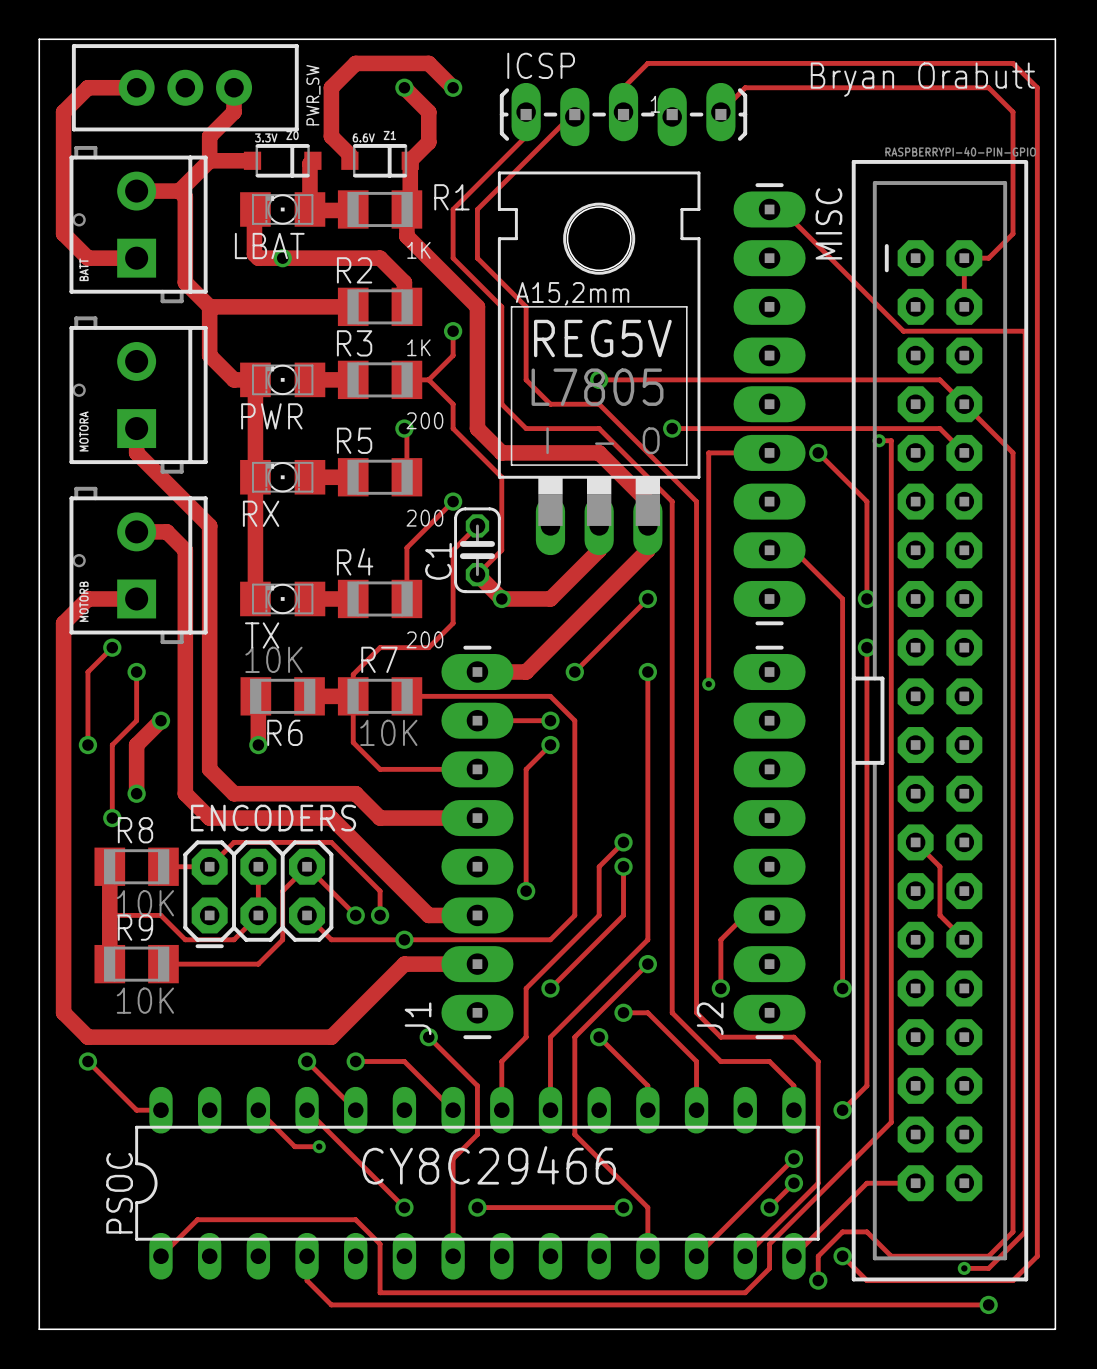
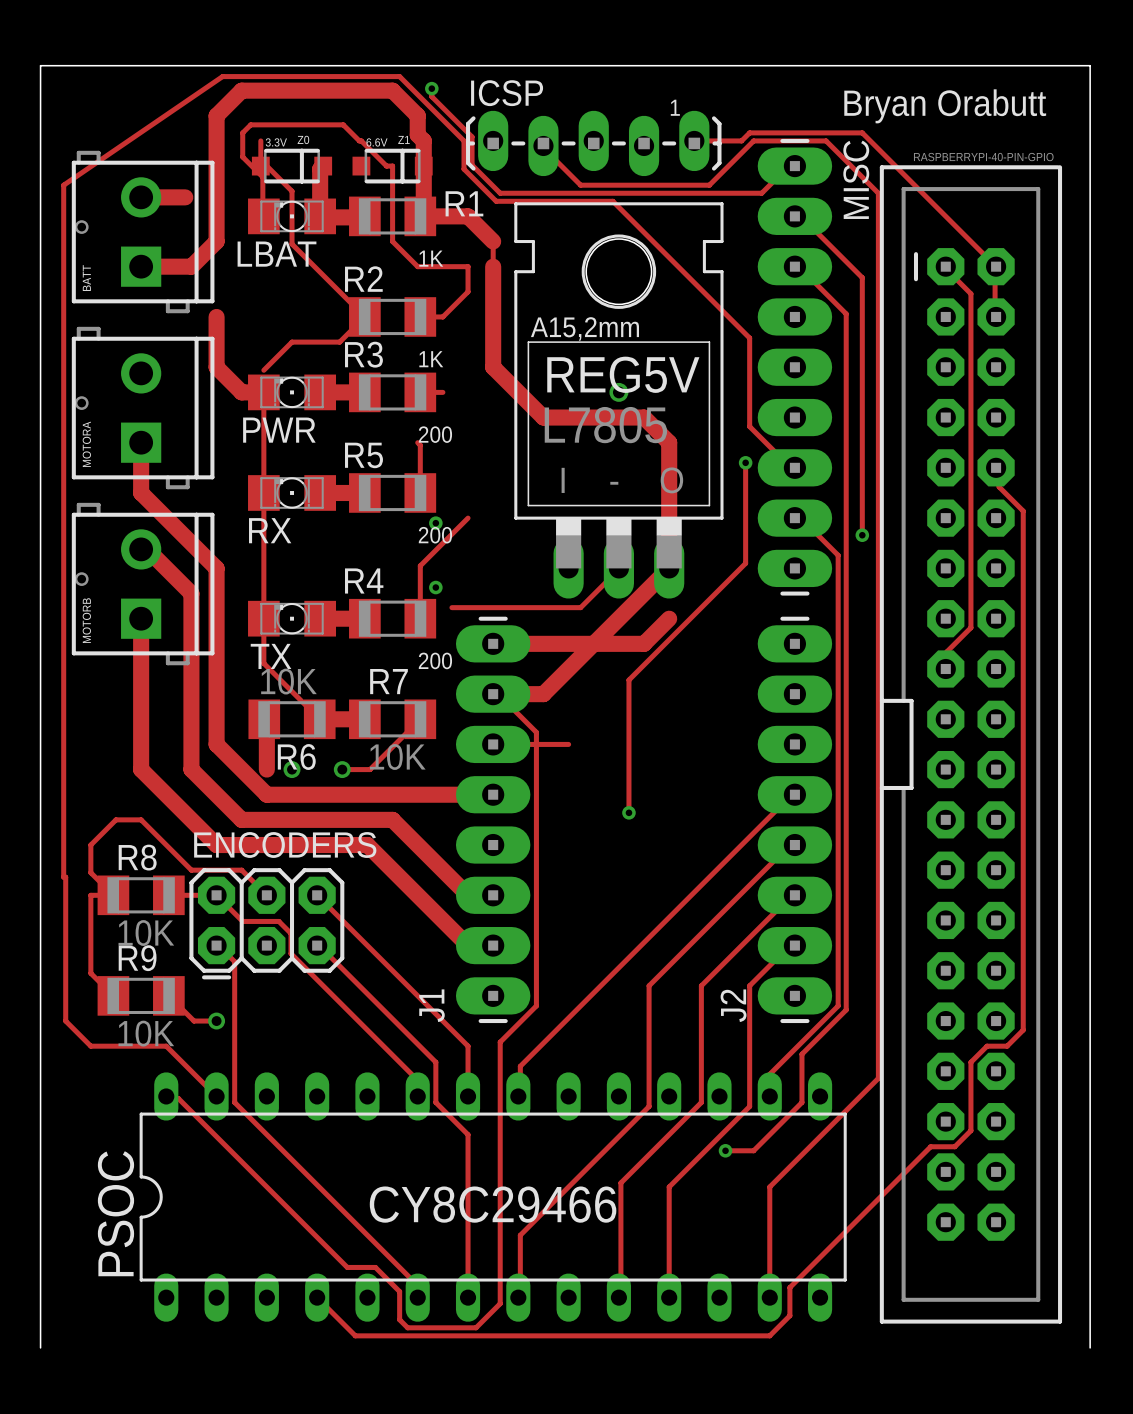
board edge: (39, 63) (39, 39) (1055, 39) (1055, 63) -> (40, 65) (1090, 65)
text position: Bryan Orabutt (922, 79) -> Bryan Orabutt (945, 106)
track: none -> (431, 88) (431, 96) (472, 136) (472, 165) (500, 193) (761, 193) (785, 169) (793, 169) (794, 166)
track: (136, 87) (87, 87) (63, 112) (63, 233) (87, 258) (136, 258) -> (216, 166) (216, 241) (191, 266) (141, 266)
PWR_SW: (185, 87) -> none
track: (234, 87) (234, 112) (209, 136) -> (423, 166) (423, 140) (417, 134) (417, 115) (392, 90) (241, 90) (216, 115) (216, 140)
track: (404, 87) (428, 112) (428, 142) (410, 160) -> none
via position: (404, 87) -> (431, 88)
track: (453, 87) (428, 63) (355, 63) (331, 87) (331, 136) (349, 154) (349, 160) -> none
via: (453, 87) -> none
track: (526, 112) (526, 136) (453, 209) (453, 258) (501, 306) (501, 404) (526, 428) (599, 428) (672, 501) (672, 1012) (720, 1061) (769, 1061) (793, 1085) (793, 1110) -> none
track: (623, 112) (623, 87) (647, 63) (1013, 63) (1037, 87) (1037, 1256) (1013, 1280) (866, 1280) (842, 1256) -> none
track: (720, 112) (745, 87) (988, 87) (1013, 112) (1013, 233) (988, 258) (964, 258) (964, 306) -> (694, 140) (741, 140) (749, 132) (862, 132) (996, 266) (996, 316)
ICSP position: (623, 114) -> (593, 143)
track: (574, 116) (569, 116) (477, 209) (477, 233) -> none
track: none -> (260, 140) (260, 160) (292, 191) (292, 244) (364, 316) (339, 342) (292, 342) (263, 370)
track: (252, 160) (209, 160) (179, 191) (185, 197) (185, 282) (209, 306) (353, 306) -> none
track: (254, 205) (254, 254) (258, 258) (380, 258) (404, 282) (404, 304) (406, 306) -> (262, 212) (262, 177) (242, 157) (242, 132) (250, 124) (343, 124) (386, 166) (392, 166) (392, 241) (417, 266) (468, 266) (468, 291) (442, 316) (420, 316)
track: (406, 209) (406, 236) (477, 306) -> (420, 216) (468, 216) (493, 241)
track: (769, 209) (781, 209) (903, 331) (1025, 331) (1025, 1231) (988, 1268) (964, 1268) -> (794, 216) (797, 213) (862, 277) (862, 535)
via: (282, 258) -> none
track: (477, 258) (526, 306) (526, 379) (550, 404) -> (493, 367) (543, 417) (568, 417)
track: none -> (493, 266) (493, 316)
track: none -> (794, 266) (797, 265) (846, 313) (846, 1009) (801, 1054) (801, 1102) (753, 1150) (725, 1150)
track: none -> (945, 266) (970, 293) (970, 627) (946, 651) (945, 669)
track: (453, 331) (453, 355) (428, 379) (453, 404) (453, 428) (501, 477) (501, 550) (477, 574) (501, 598) (550, 598) (599, 550) (599, 525) -> none
via: (453, 331) -> none
track: (477, 355) (477, 428) (501, 452) (599, 452) (647, 501) -> (618, 417) (644, 417) (669, 442) (669, 518)
REG5V position: (599, 363) -> (618, 400)
track width: thick (255, 379) (255, 598) -> thin (263, 392) (263, 618)
track: (599, 379) (939, 379) (1013, 452) (1013, 1231) (988, 1256) (891, 1256) (866, 1231) (842, 1231) (818, 1256) (818, 1280) -> none
track width: thin (550, 404) (599, 404) -> thick (568, 417) (618, 417)
track: (599, 404) (696, 501) (696, 1012) (720, 1037) (793, 1037) (818, 1061) (818, 1183) (745, 1256) -> (543, 145) (580, 185) (709, 185) (753, 140) (826, 140) (878, 193) (878, 1078) (769, 1186) (769, 1297)
MISC position: (769, 404) -> (794, 367)
via: (404, 428) -> none
track: (672, 428) (939, 428) (964, 452) -> none
via: (672, 428) -> none
track: (879, 440) (891, 440) (891, 1122) (769, 1244) (769, 1268) (745, 1292) (380, 1292) (380, 1244) (355, 1219) (197, 1219) (160, 1256) -> none
via: (879, 440) -> none
track: none -> (745, 462) (745, 563) (628, 680) (628, 812)
via: none -> (745, 462)
track: (136, 452) (209, 525) (209, 550) -> (141, 467) (141, 492) (216, 568)
track: (769, 452) (708, 452) (708, 684) -> (794, 467) (793, 470) (749, 426) (749, 338) (612, 201) (496, 201) (464, 169) (464, 140) (399, 76) (222, 76) (63, 185) (63, 877) (65, 877)
track: (818, 452) (866, 501) (866, 598) -> none
via: (818, 452) -> none
via: (453, 501) -> none
track: none -> (794, 518) (797, 515) (838, 555) (838, 1005) (769, 1074) (769, 1096)
via: none -> (435, 523)
via: none -> (862, 535)
track: (477, 525) (453, 550) (453, 623) (428, 647) (380, 647) (353, 674) (353, 742) (380, 769) -> (216, 744) (266, 794) (392, 794)
track: (142, 531) (166, 531) (185, 550) (185, 574) -> (147, 549) (191, 593)
C1: (477, 550) -> none
track: none -> (618, 568) (580, 607) (451, 607)
track: (769, 550) (793, 550) (842, 598) (842, 988) -> none
via: none -> (435, 587)
track: (136, 598) (87, 598) (63, 623) (63, 849) -> (141, 618) (141, 694)
track: none -> (263, 618) (263, 663) (319, 719)
via: (501, 598) -> none
track width: thin (647, 598) (623, 623) -> thick (669, 618) (644, 643)
via: (647, 598) -> none
via: (866, 598) -> none
track: (623, 623) (574, 672) -> (644, 643) (493, 643)
track: (112, 647) (87, 672) (87, 745) -> none
via: (112, 647) -> none
track: (866, 647) (866, 1085) (842, 1110) -> none
via: (866, 647) -> none
track width: thin (136, 672) (136, 720) -> thick (141, 694) (141, 744)
via: (136, 672) -> none
via: (574, 672) -> none
track: (647, 672) (647, 939) (550, 1037) (550, 1110) -> none
via: (647, 672) -> none
track: none -> (492, 696) (496, 692) (536, 732) (536, 1005) (500, 1042) (500, 1303) (476, 1327) (407, 1327) (399, 1319) (399, 1291) (375, 1267) (347, 1267) (178, 1098) (166, 1098) (166, 1096)
via: (708, 684) -> none
track: (406, 696) (550, 696) (574, 720) (574, 915) (550, 939) (331, 939) (307, 915) -> (420, 719) (370, 769) (342, 769)
track: (136, 720) (112, 745) (112, 818) -> none
track: (160, 720) (136, 745) (136, 793) -> none
via: (160, 720) -> none
track: (209, 720) (209, 769) -> (191, 769) (216, 794)
via: (550, 720) -> none
via: (87, 745) -> none
track: (185, 745) (185, 793) -> (141, 744) (141, 769) (191, 819)
via: (258, 745) -> none
via: none -> (292, 769)
via: none -> (342, 769)
track: (550, 745) (526, 769) (526, 891) -> none
via: (550, 745) -> none
track width: thin (380, 769) (477, 769) -> thick (392, 794) (493, 794)
via: none -> (628, 812)
via: (136, 793) -> none
track: (355, 793) (380, 818) (477, 818) -> (367, 819) (392, 819) (468, 895) (493, 895)
via: (112, 818) -> none
track: (331, 818) (428, 915) (453, 915) -> (342, 845) (367, 845) (468, 945)
track: none -> (794, 845) (789, 845) (649, 985) (649, 1106) (520, 1235) (520, 1295) (518, 1297)
J1 position: (477, 842) -> (493, 819)
track: (623, 842) (599, 866) (599, 915) (526, 988) (526, 1037) (503, 1059) -> (794, 794) (793, 792) (520, 1066) (520, 1094)
via: (623, 842) -> none
J2 position: (769, 842) -> (794, 819)
track: (915, 842) (939, 866) (939, 915) (964, 939) -> none
track width: thick (63, 849) (63, 988) -> thin (65, 877) (65, 1021)
track: (109, 866) (109, 964) -> none
track: (209, 866) (234, 842) (331, 842) (380, 891) (380, 915) -> (216, 895) (242, 921) (278, 921) (291, 933) (291, 953) (415, 1078) (415, 1094) (417, 1096)
track: (258, 866) (258, 915) (234, 939) (185, 939) (160, 915) (109, 915) -> (266, 895) (241, 870) (191, 870) (141, 819) (115, 819) (90, 845) (90, 872) (113, 895) (90, 895) (90, 973) (113, 995)
track: (307, 866) (282, 891) (282, 939) (258, 964) (163, 964) -> (216, 1021) (194, 1021) (168, 995)
track: (623, 866) (623, 915) (550, 988) -> none
via: (623, 866) -> none
track: none -> (794, 895) (793, 893) (701, 985) (701, 1102) (620, 1182) (620, 1295) (618, 1297)
via: (526, 891) -> none
track: none -> (216, 945) (234, 961) (234, 1102) (415, 1283) (415, 1295) (417, 1297)
track: none -> (367, 945) (468, 1046) (468, 1096)
via: (355, 915) -> none
via: (380, 915) -> none
track: (764, 915) (745, 915) (720, 939) (720, 988) -> none
via: (404, 939) -> none
track: (477, 964) (404, 964) (331, 1037) (87, 1037) (63, 1012) (63, 988) -> (216, 1096) (166, 1046) (90, 1046) (65, 1021)
track: (647, 964) (574, 1037) (574, 1134) (647, 1207) -> (789, 945) (749, 985) (749, 1106) (669, 1186) (669, 1247)
via: (647, 964) -> none
via: none -> (216, 1021)
via: (550, 988) -> none
via: (720, 988) -> none
via: (842, 988) -> none
track: (623, 1012) (647, 1012) (696, 1061) (696, 1110) -> none
via: (623, 1012) -> none
track: (428, 1037) (477, 1085) (477, 1134) (453, 1158) -> (317, 945) (435, 1062) (435, 1102) (468, 1134) (468, 1197)
via: (428, 1037) -> none
track: (599, 1037) (647, 1085) (647, 1110) -> none
via: (599, 1037) -> none
track: (87, 1061) (136, 1110) (160, 1110) -> none
via: (87, 1061) -> none
track: (307, 1061) (355, 1110) -> none
via: (307, 1061) -> none
track: (355, 1061) (404, 1061) (453, 1110) -> none
via: (355, 1061) -> none
track: (501, 1061) (501, 1110) -> none
track: (258, 1110) (294, 1146) (319, 1146) -> none
track: (307, 1110) (404, 1207) -> none
via: (842, 1110) -> none
via: none -> (725, 1150)
via: (319, 1146) -> none
PSOC: none -> (493, 1197)
track: (793, 1158) (696, 1256) -> none
via: (793, 1158) -> none
PSOC: (477, 1183) -> none
track: (793, 1183) (769, 1207) -> none
via: (793, 1183) -> none
track: (915, 1183) (866, 1183) (793, 1256) -> none
via: (404, 1207) -> none
track: (477, 1207) (623, 1207) -> none
via: (477, 1207) -> none
via: (623, 1207) -> none
via: (769, 1207) -> none
track: (307, 1256) (307, 1280) (331, 1304) (988, 1304) -> (317, 1297) (355, 1335) (769, 1335) (789, 1315) (789, 1287) (930, 1146) (954, 1146) (970, 1130) (970, 1062) (987, 1046) (1007, 1046) (1023, 1030) (1023, 511) (999, 486) (999, 470) (996, 467)
via: (842, 1256) -> none
via: (964, 1268) -> none
via: (818, 1280) -> none
board edge: (39, 1304) (39, 1329) (1055, 1329) (1055, 1304) -> none
via: (988, 1304) -> none

